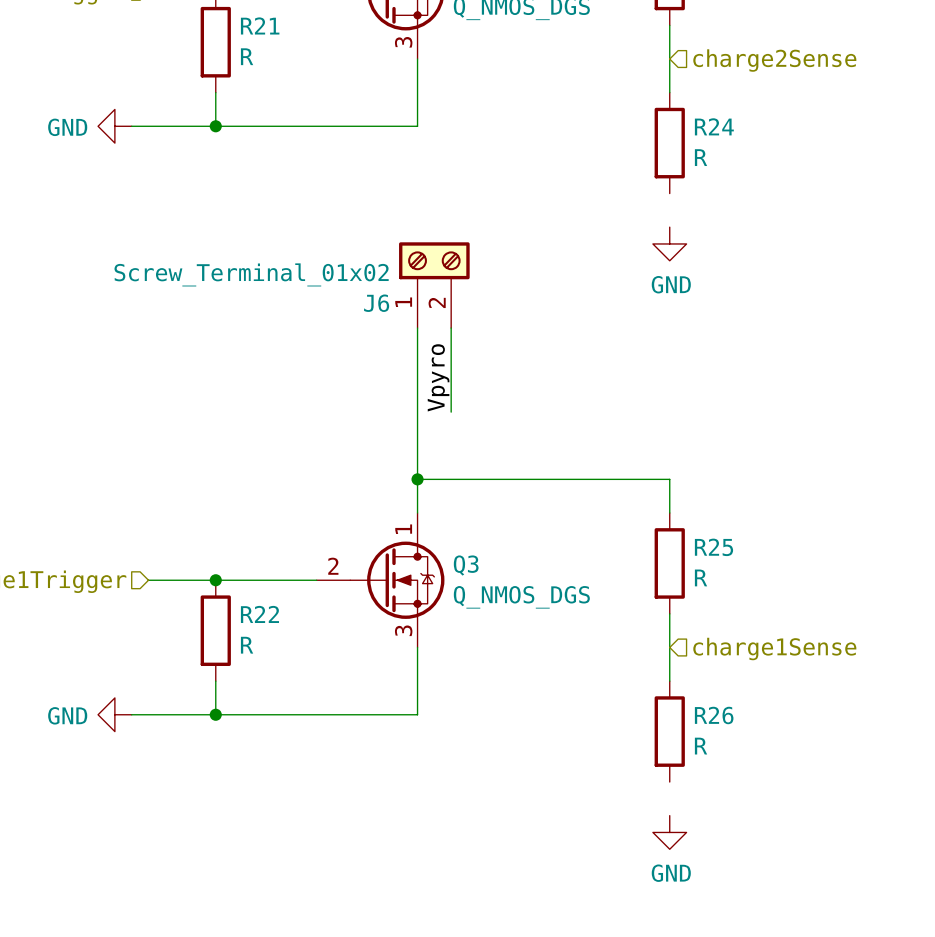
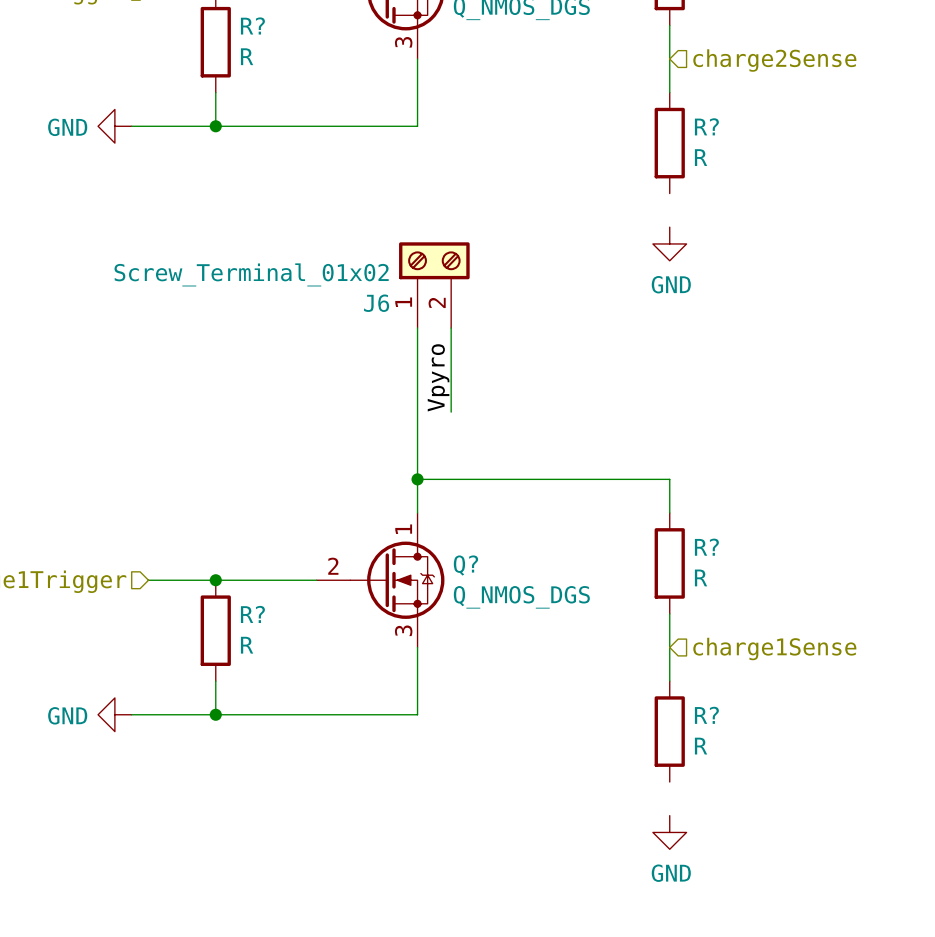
R21 name: R21 (260, 25) -> R? (252, 25)
R24 name: R24 (714, 126) -> R? (706, 126)
R25 name: R25 (713, 547) -> R? (706, 547)
Q3 name: Q3 (466, 565) -> Q? (465, 565)
R22 name: R22 (259, 614) -> R? (252, 614)
R26 name: R26 (714, 715) -> R? (706, 715)

